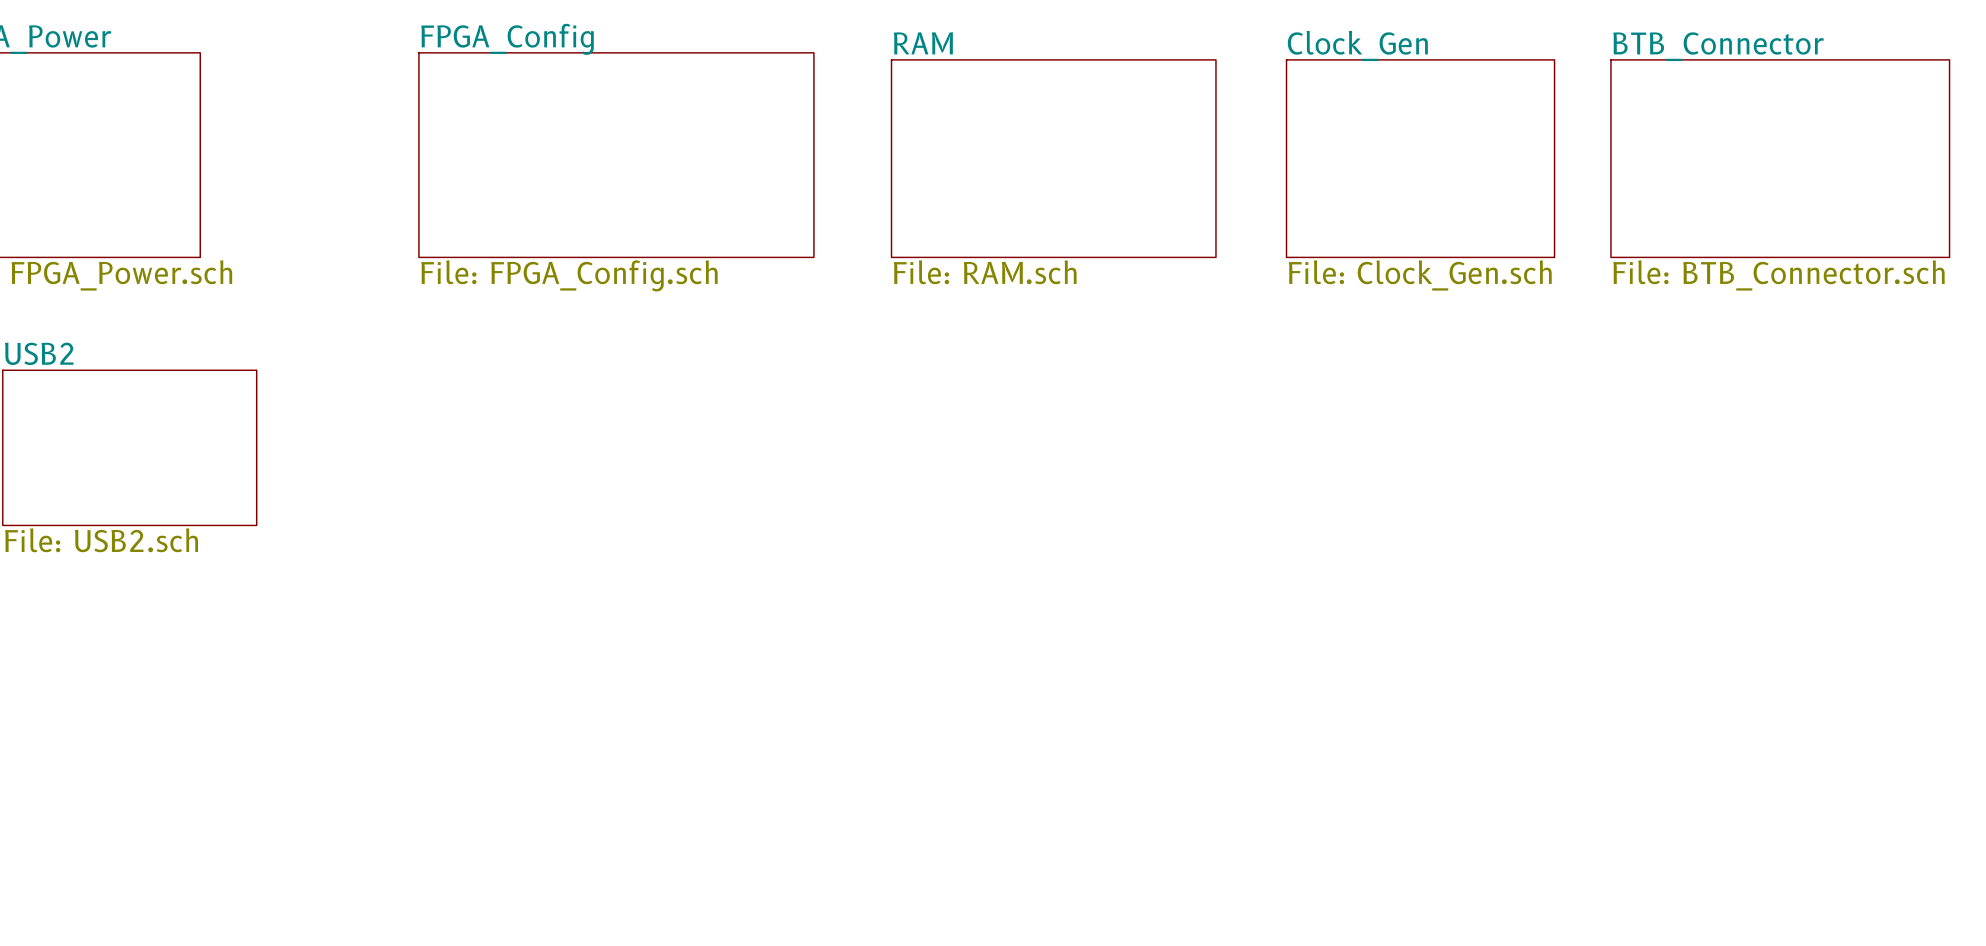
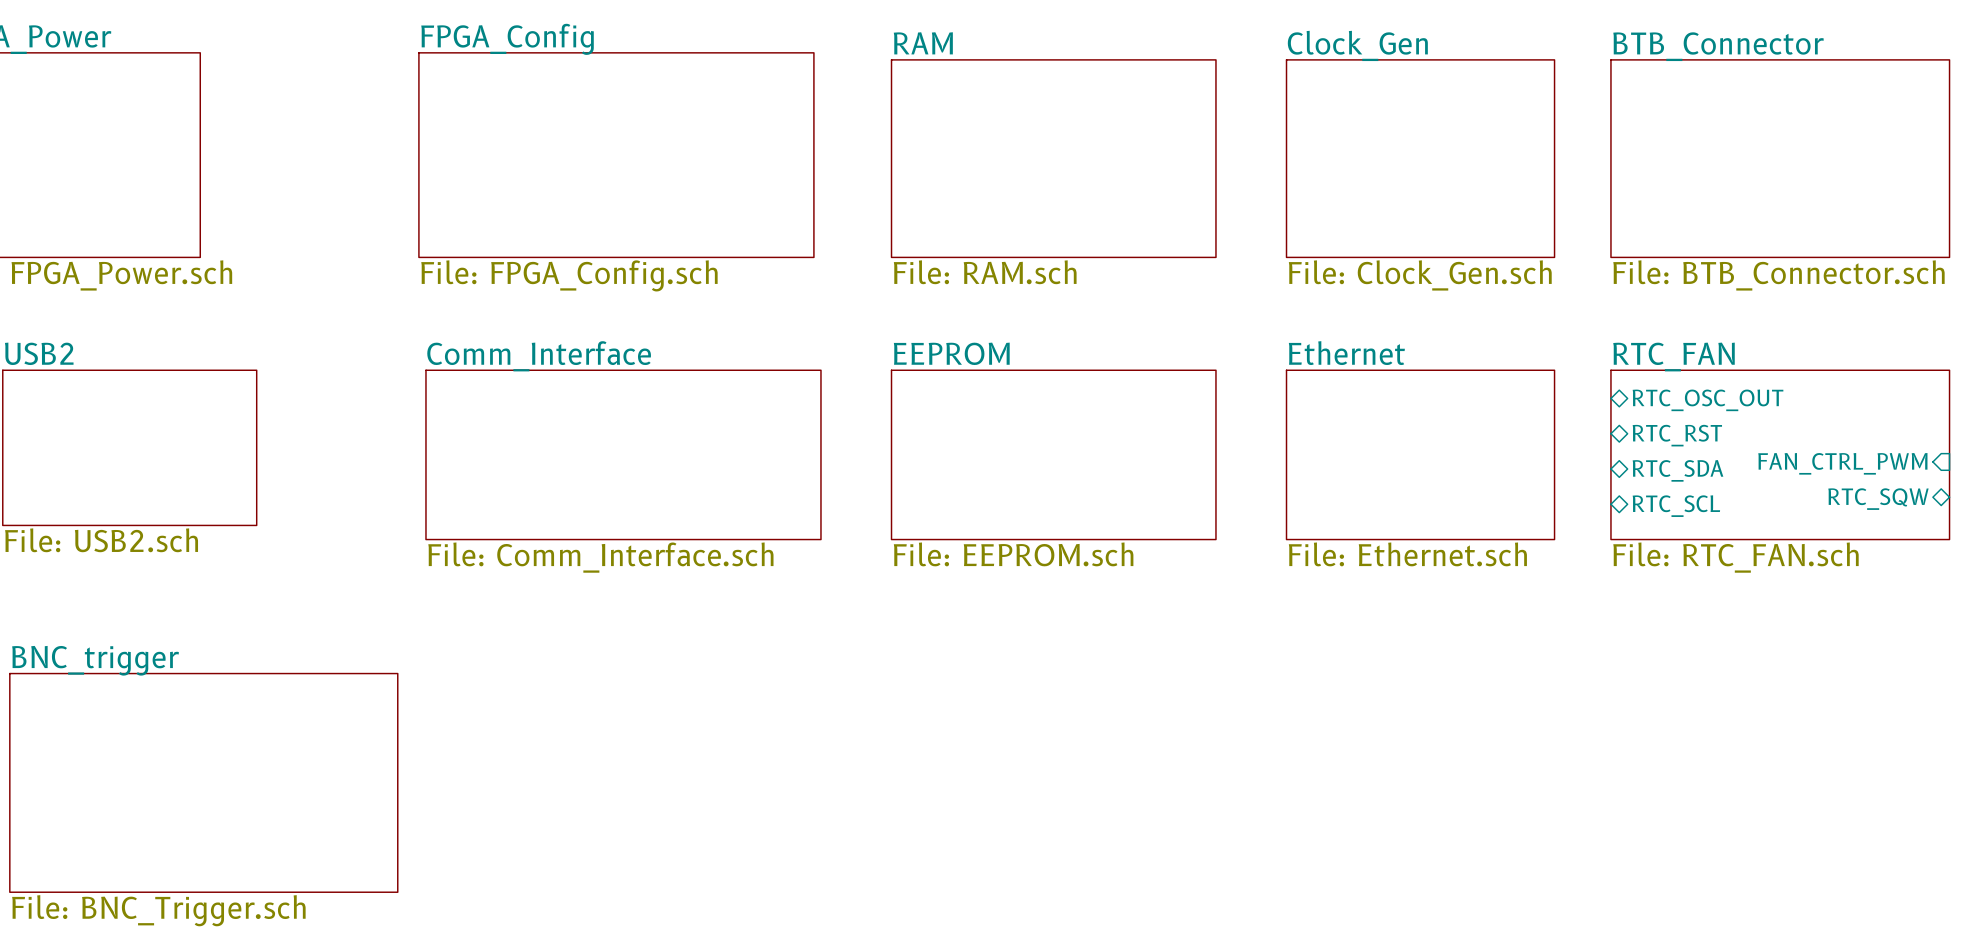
sheet pin: none -> RTC_OSC_OUT (1708, 400)
sheet pin: none -> RTC_RST (1677, 435)
sheet Comm_Interface: none -> File: Comm_Interface.sch (623, 454)
sheet EEPROM: none -> File: EEPROM.sch (1053, 454)
sheet Ethernet: none -> File: Ethernet.sch (1420, 454)
sheet RTC_FAN: none -> File: RTC_FAN.sch (1780, 454)
sheet pin: none -> FAN_CTRL_PWM (1842, 463)
sheet pin: none -> RTC_SDA (1678, 470)
sheet pin: none -> RTC_SQW (1878, 499)
sheet pin: none -> RTC_SCL (1676, 506)
sheet BNC_trigger: none -> File: BNC_Trigger.sch (203, 782)

